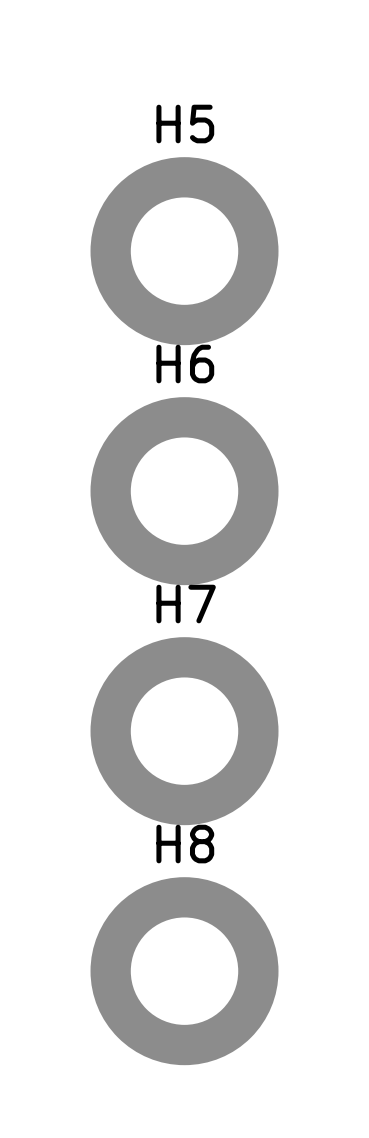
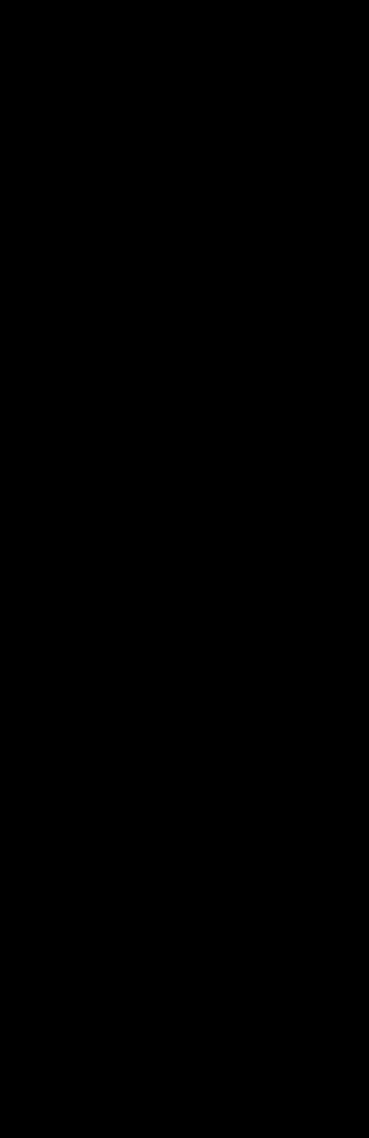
H5: (184, 251) -> none
H6: (184, 491) -> none
H7: (184, 731) -> none
H8: (184, 971) -> none

